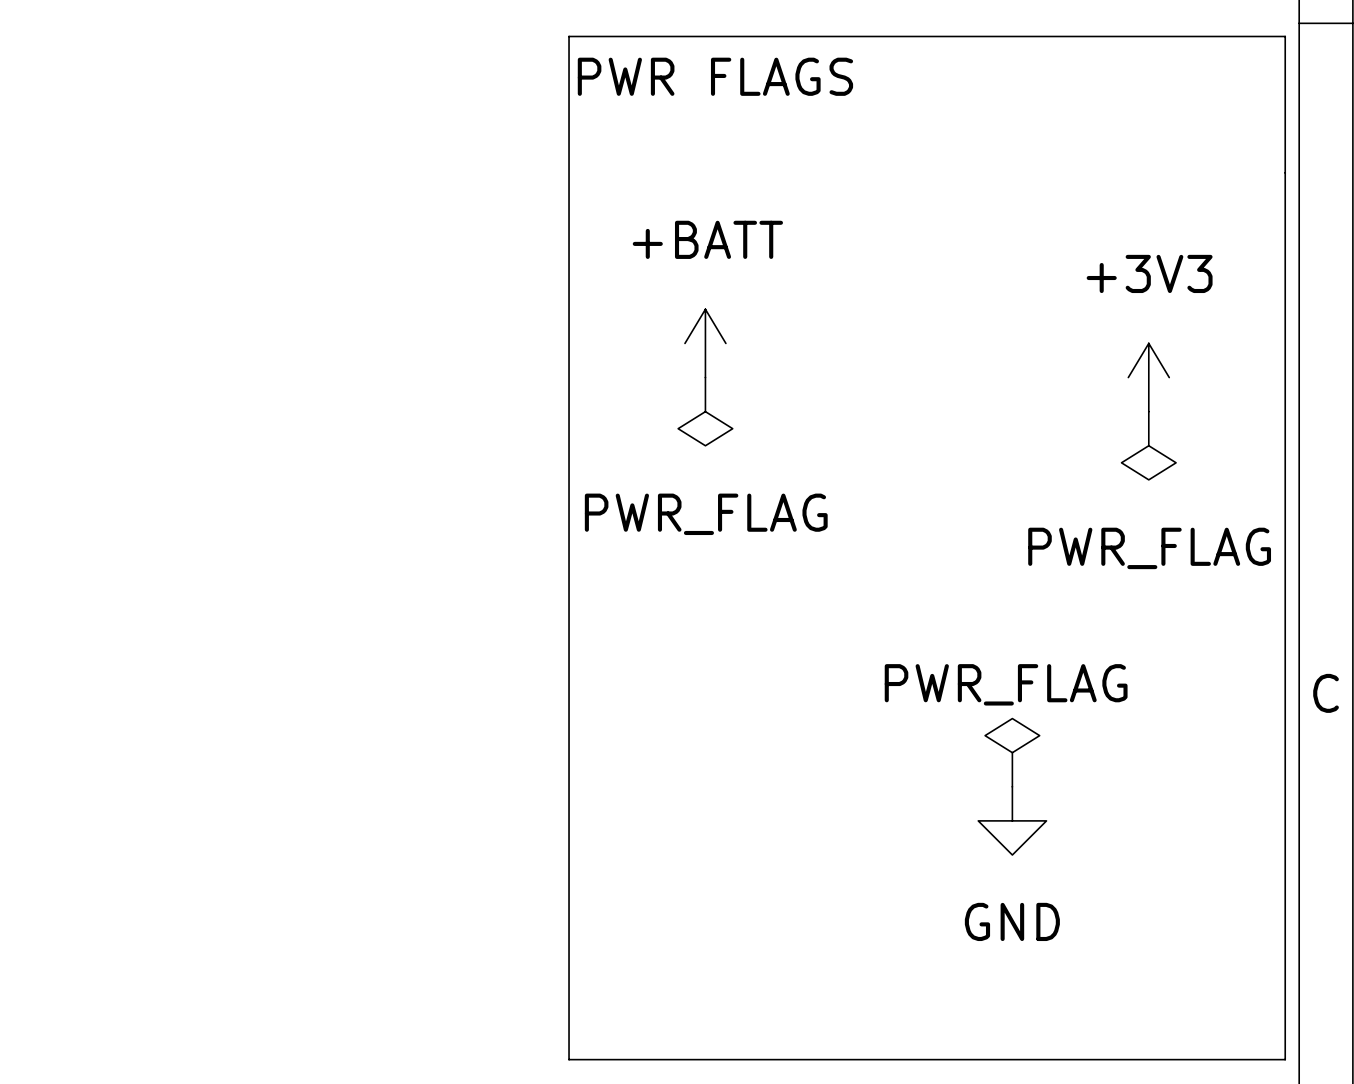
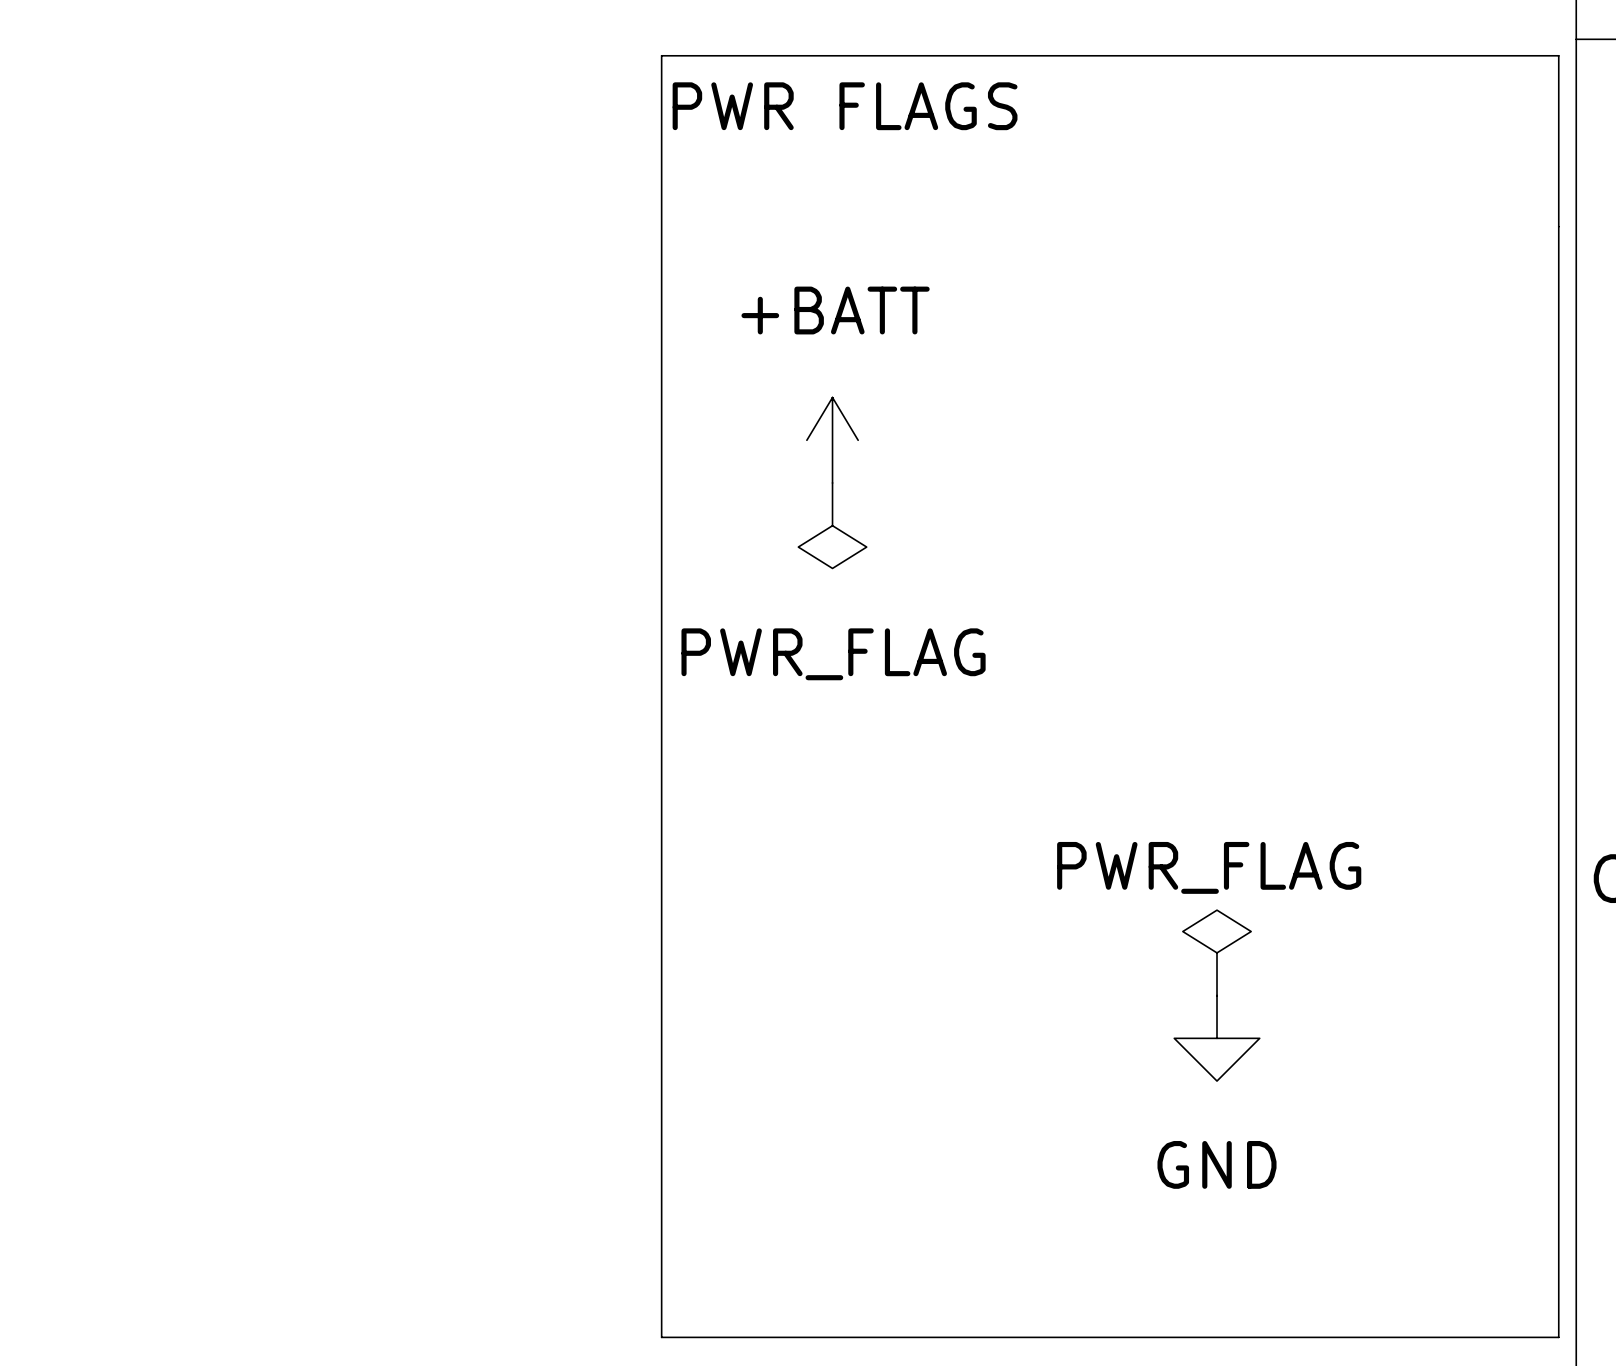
power symbol: +3V3 (1148, 377) -> none
power symbol: PWR_FLAG (1148, 445) -> none

